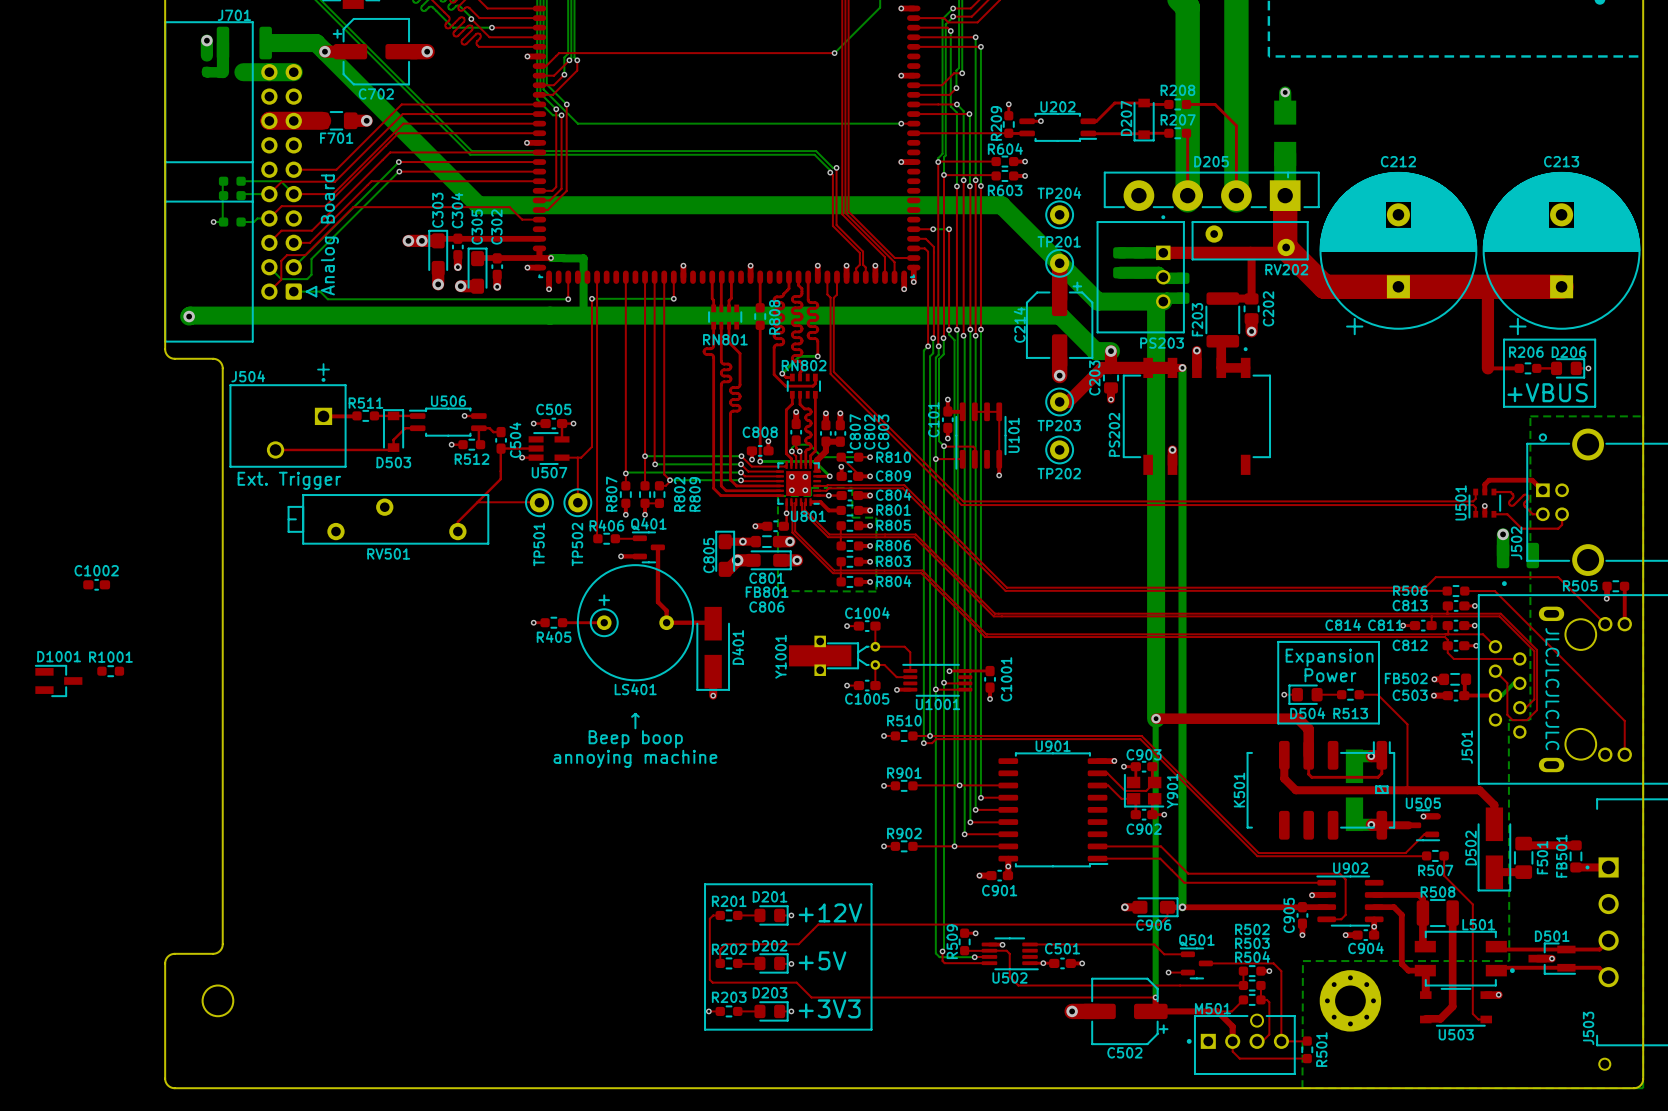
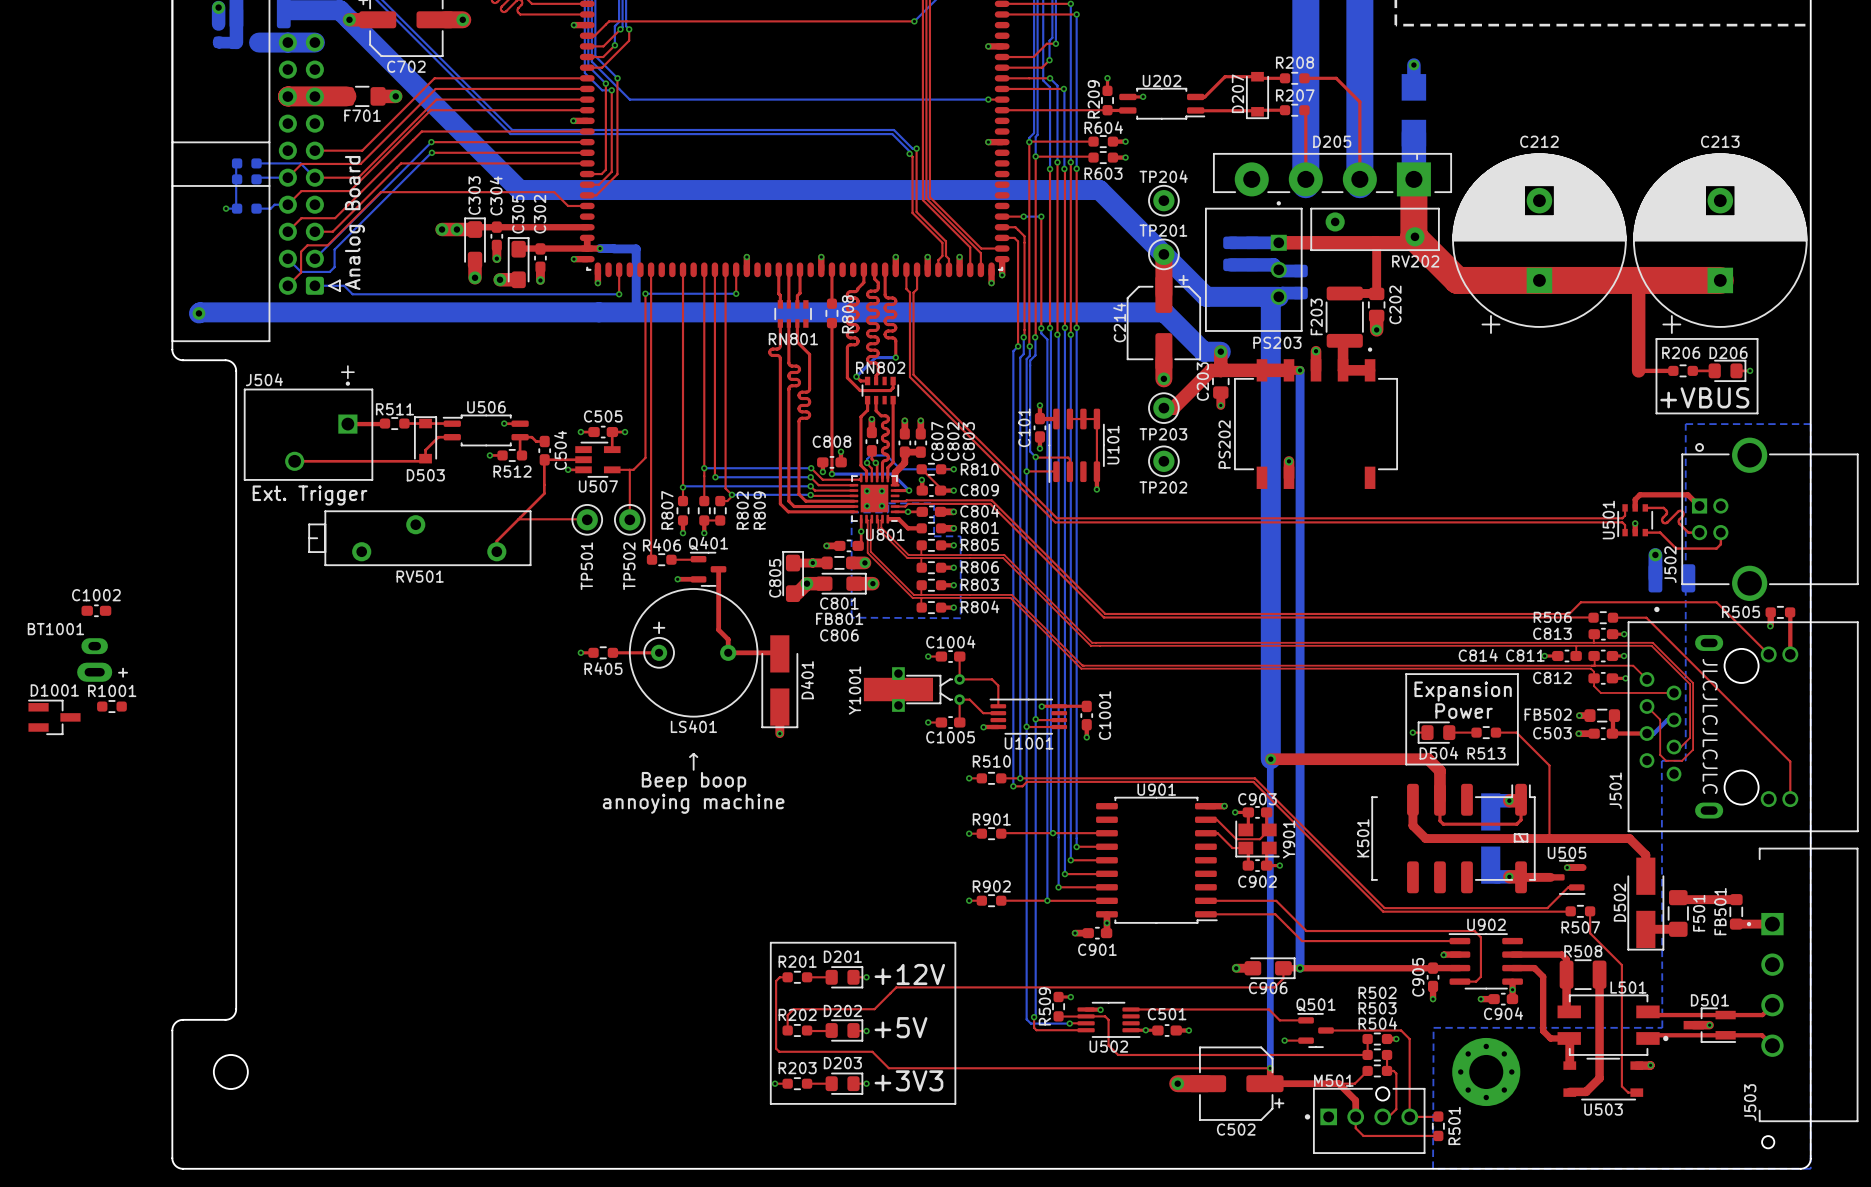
BT1001: none -> (102, 659)

